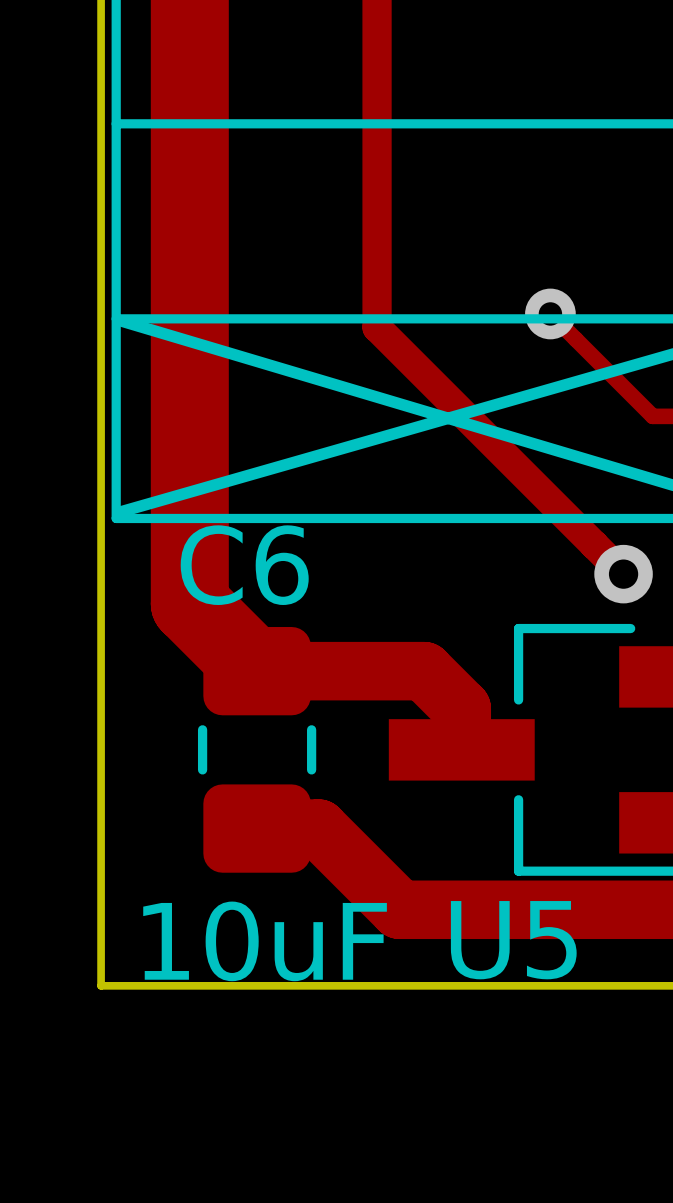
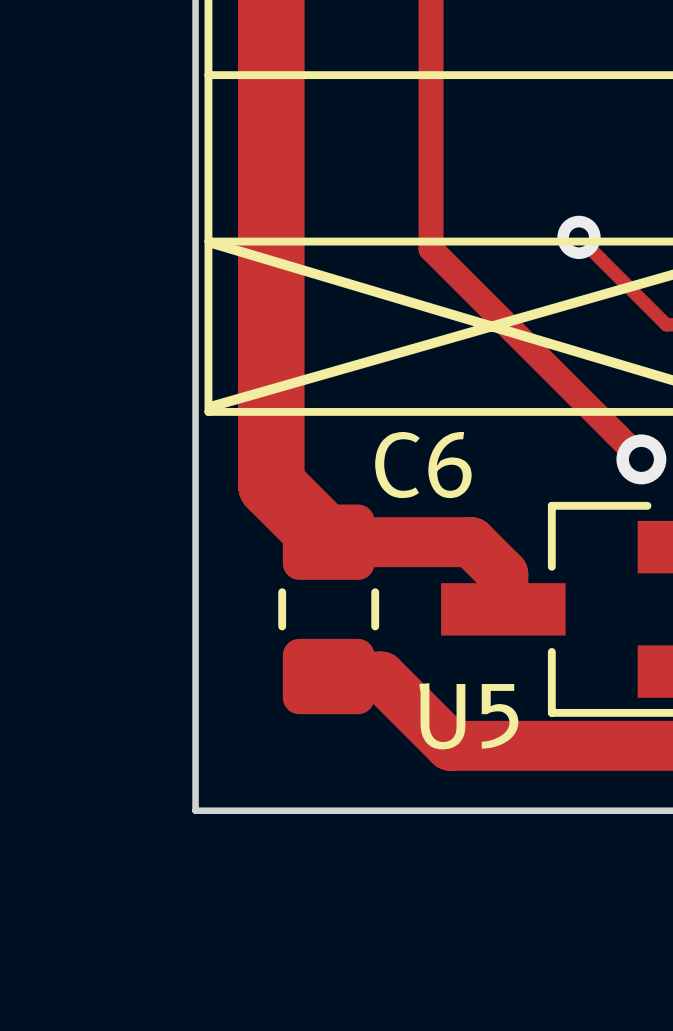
C6 name position: C6 (244, 565) -> C6 (423, 465)
U5 name position: U5 (513, 940) -> U5 (468, 716)
C6 value: 10uF (265, 941) -> none

